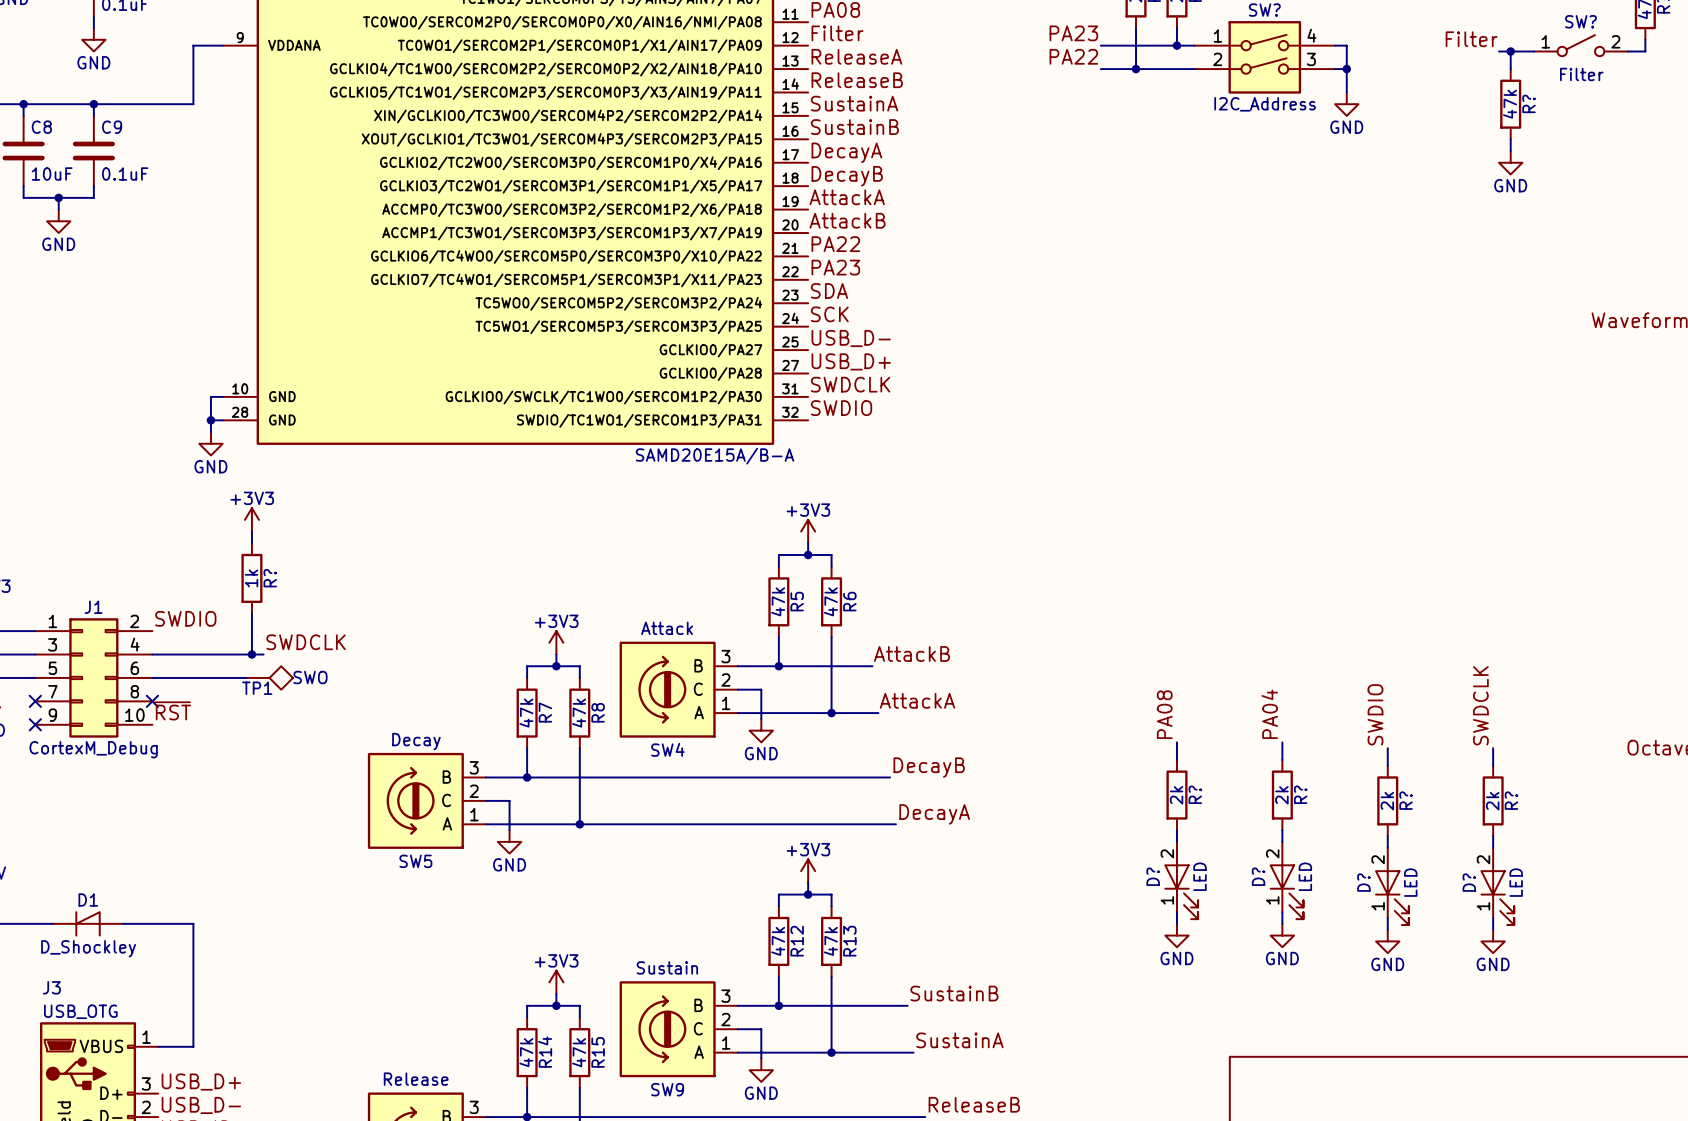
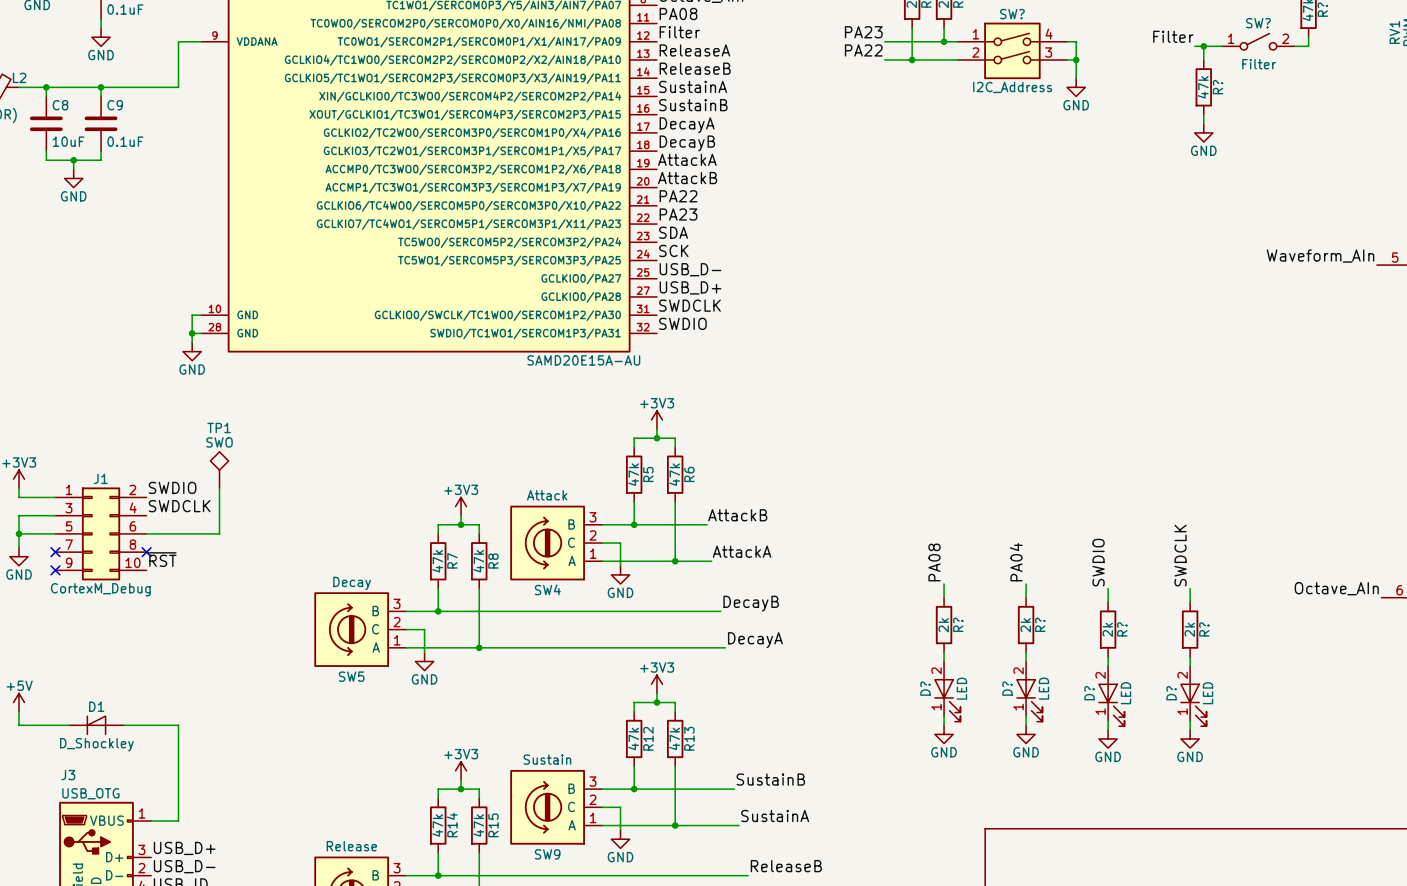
part value: SAMD20E15A/B-A (715, 456) -> SAMD20E15A-AU (583, 360)
power symbol: +3V3 (251, 519) -> none
wire: (251, 531) (251, 543) -> none
R?: 1k (251, 578) -> none
wire: (251, 613) (251, 654) -> none
wire: none -> (219, 488) (219, 533)
label position: SWDCLK (306, 642) -> SWDCLK (179, 506)
wire: (152, 654) (263, 654) -> none
junction: (251, 654) -> none
TP1 position: (269, 677) -> (219, 470)
TP1 rotation: 0° (281, 677) -> 90° counterclockwise (219, 461)
TP1 name position: TP1 (257, 688) -> TP1 (219, 427)

